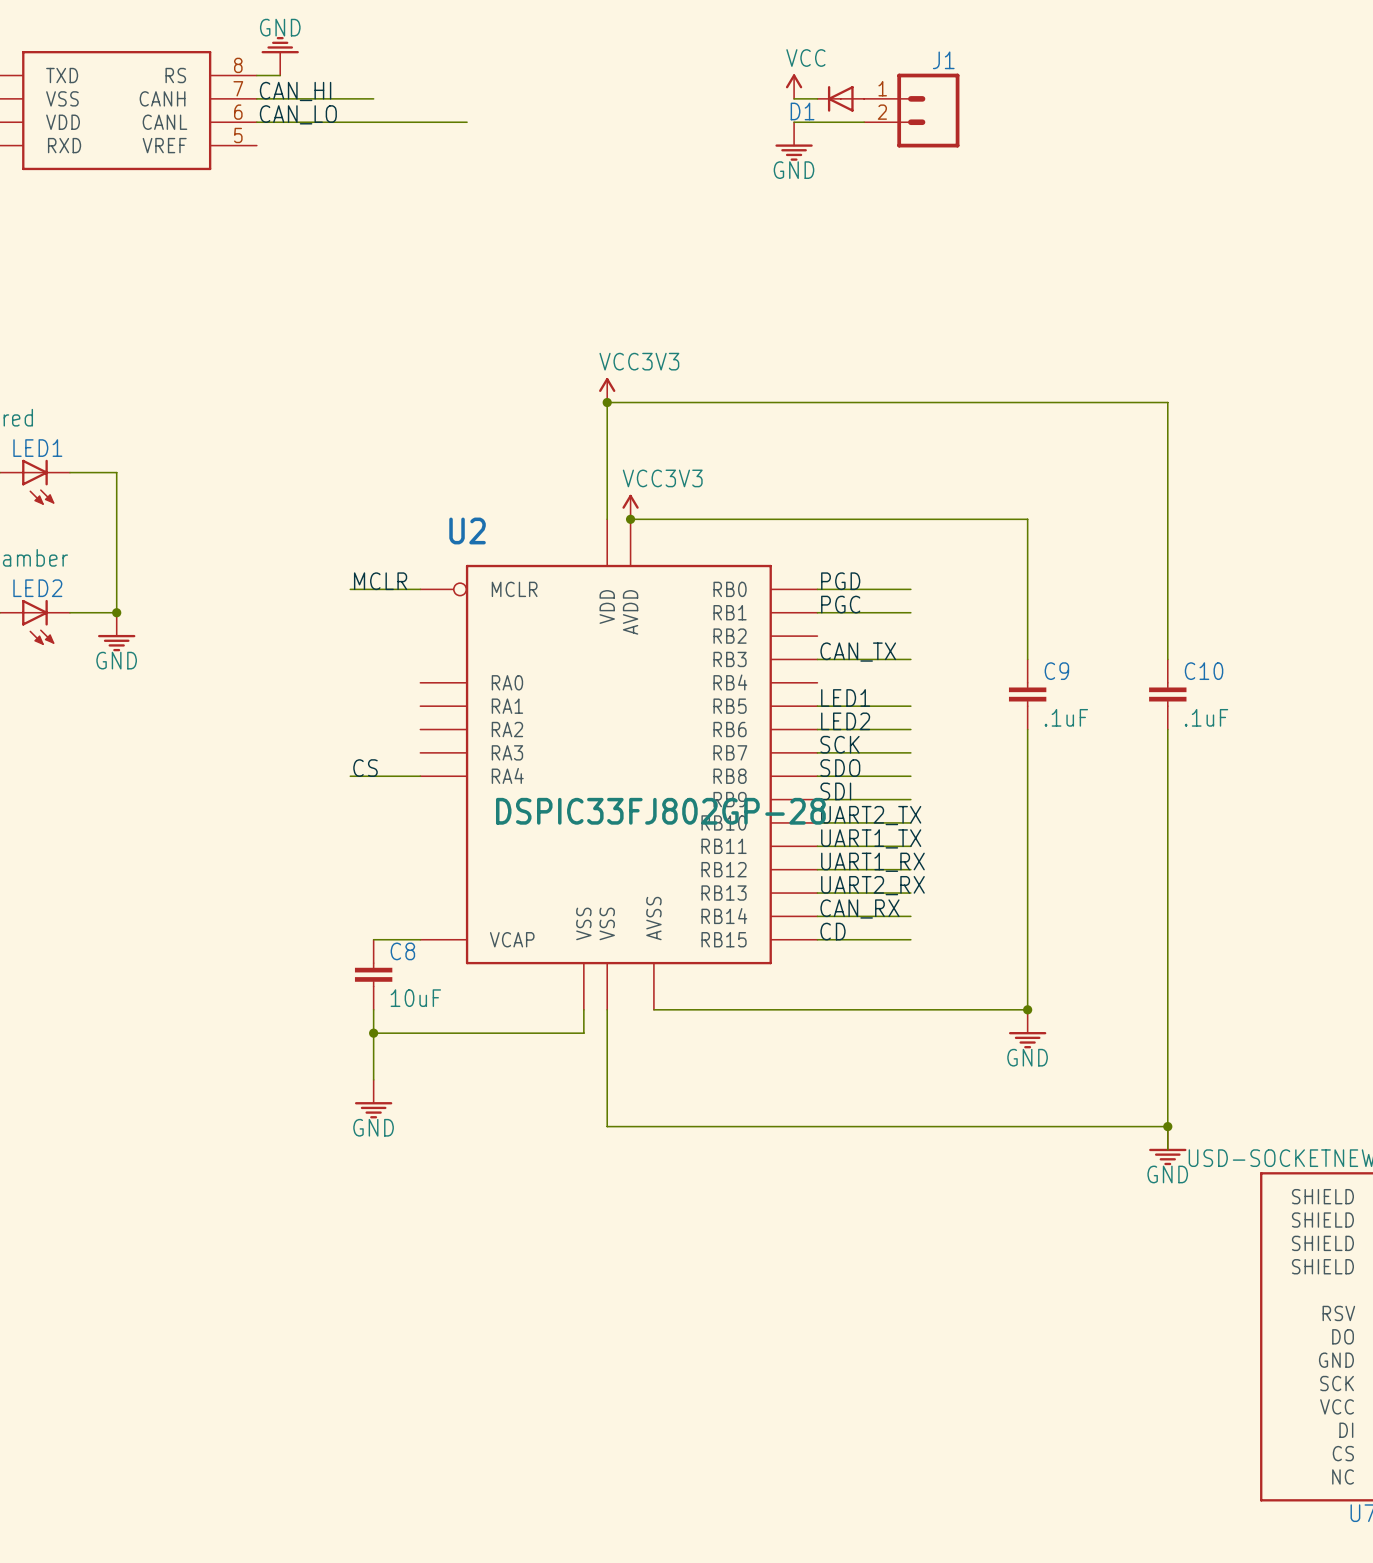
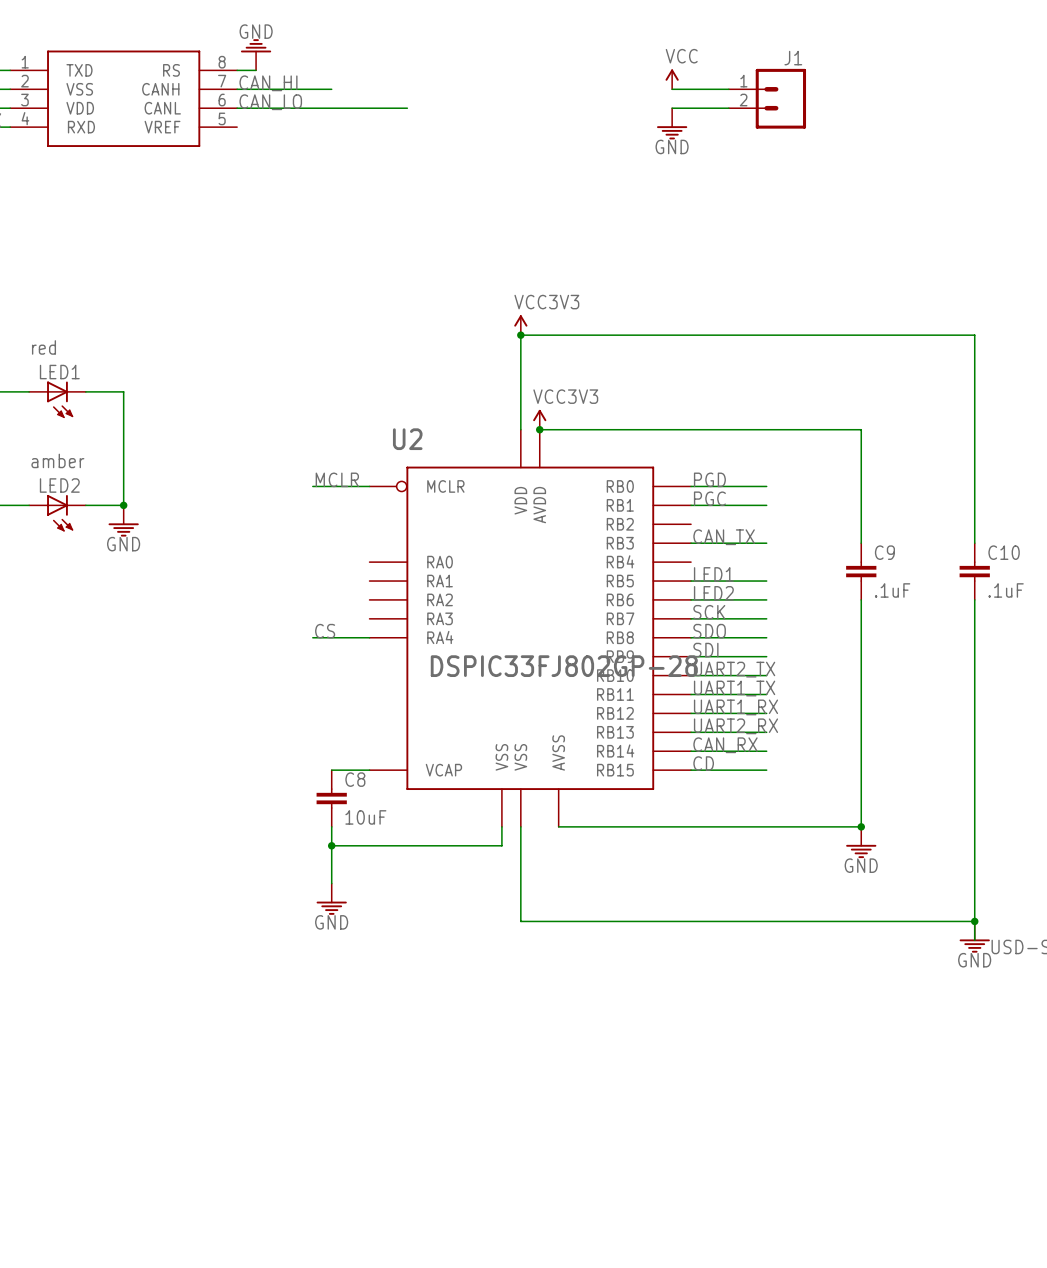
D1: (840, 98) -> none

